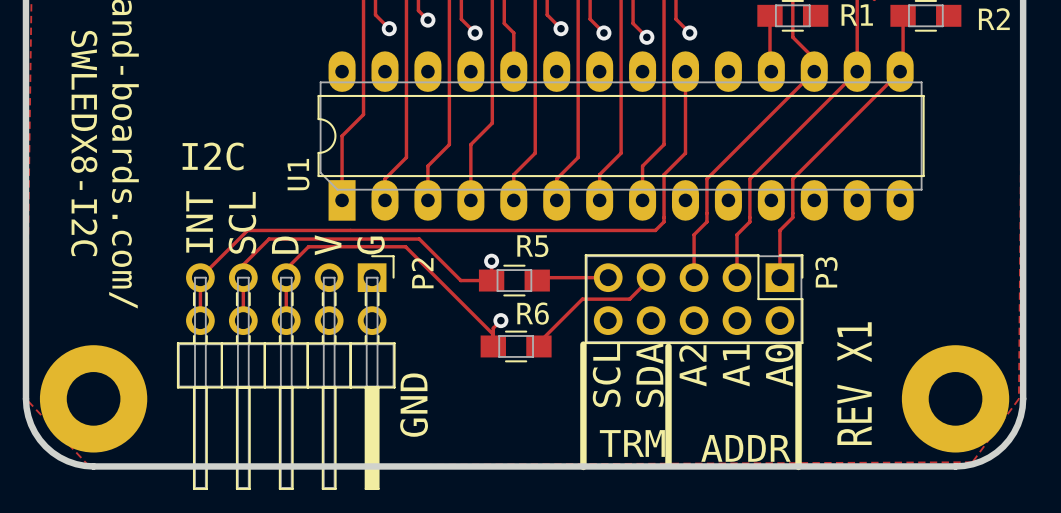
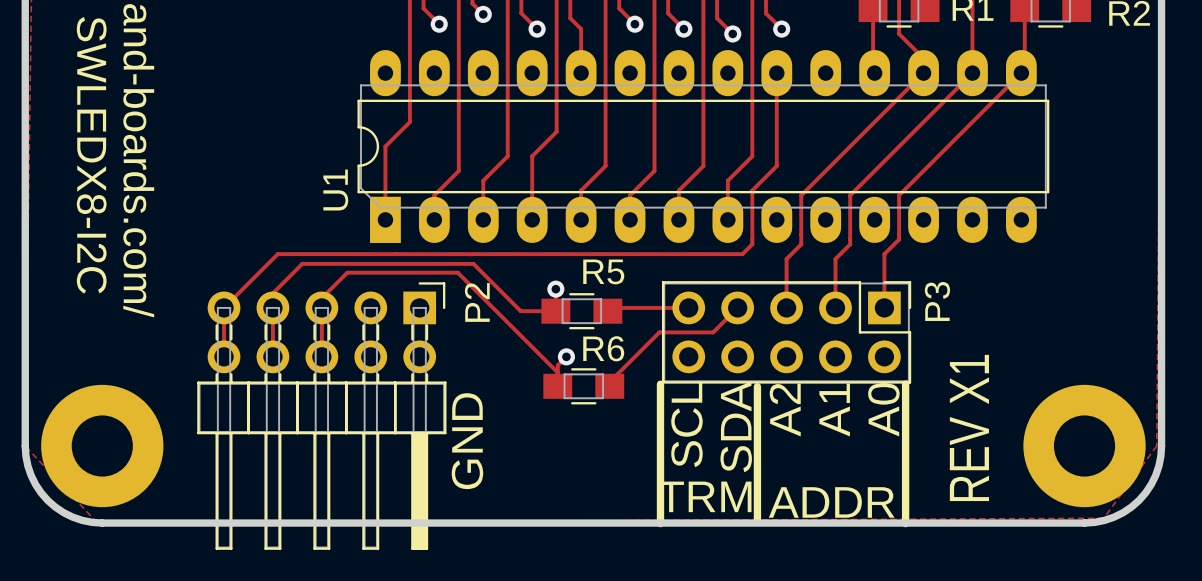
text: I2C (213, 156) -> none
text: INT (199, 221) -> none
text: SCL (242, 222) -> none
text: D (285, 245) -> none
text: V (328, 245) -> none
text: G (370, 245) -> none

